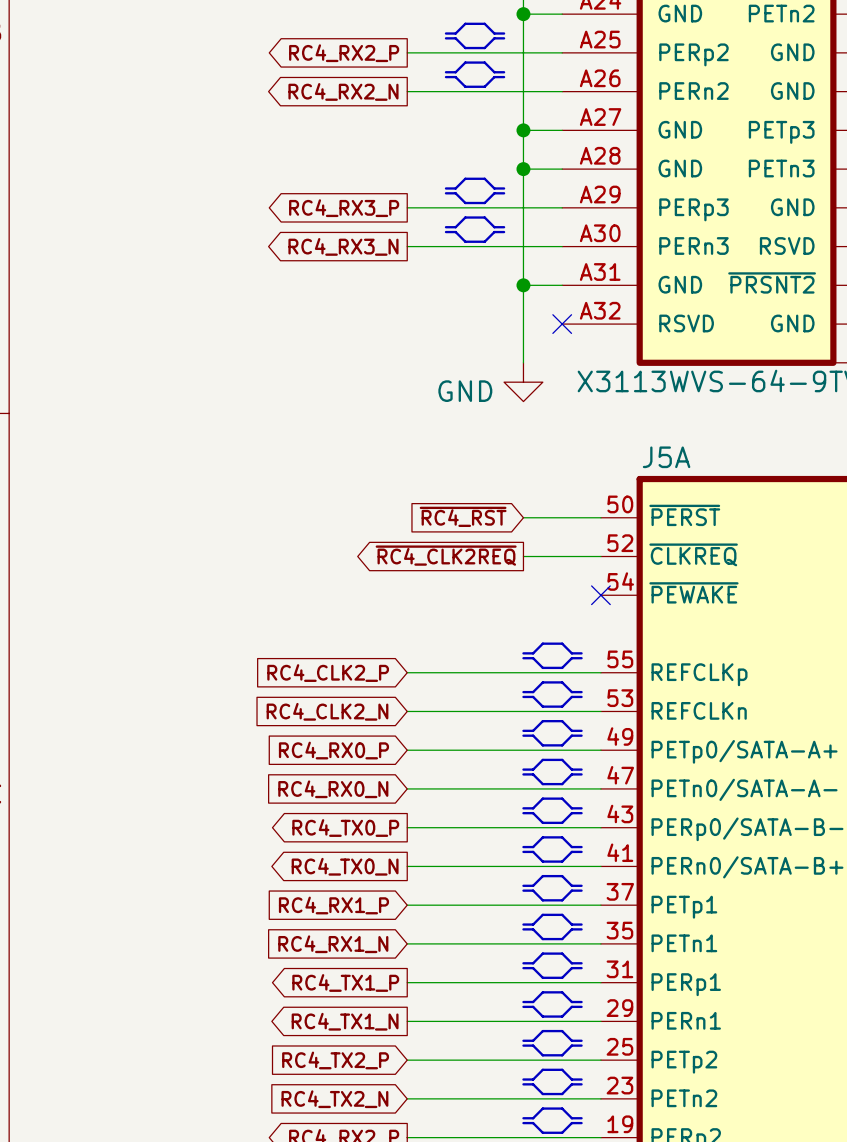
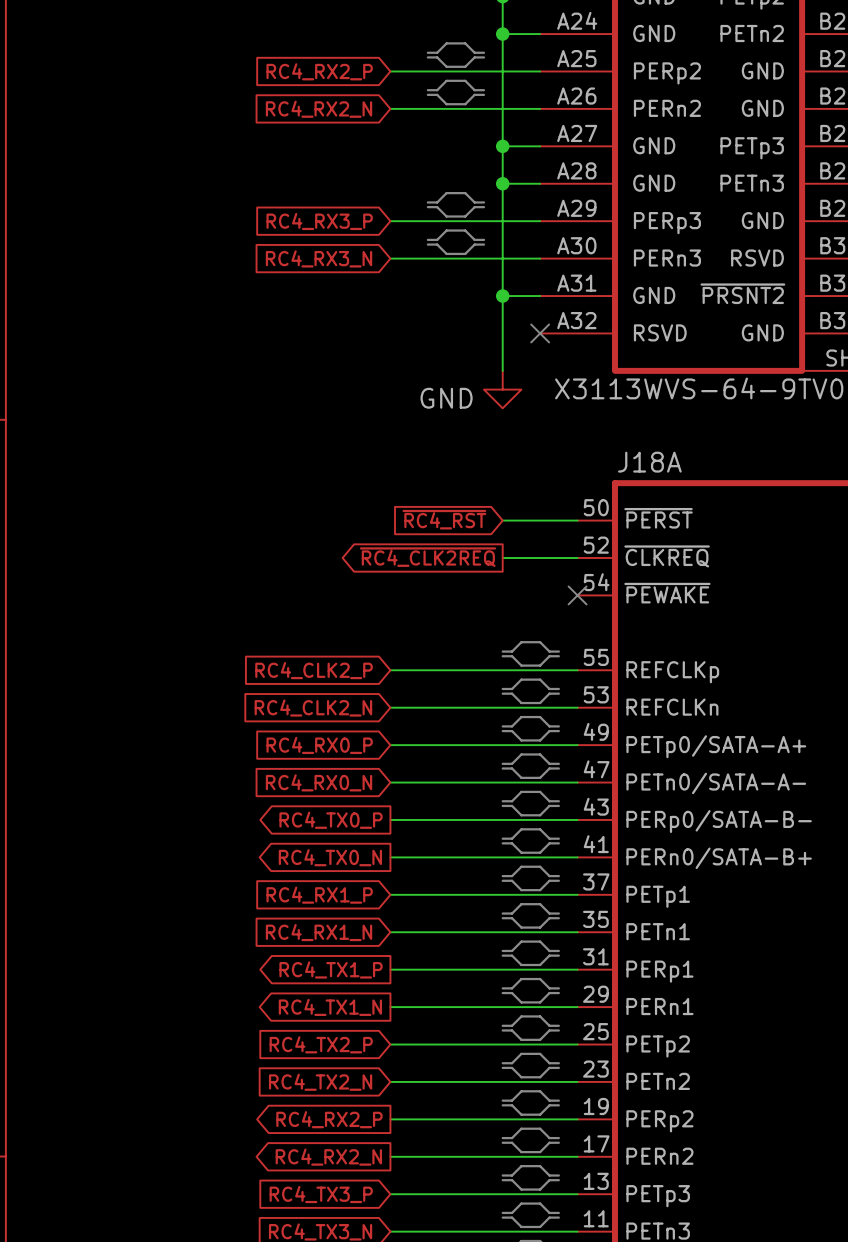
global label shape: output (344, 53) -> input (319, 71)
global label shape: output (343, 91) -> input (319, 109)
global label shape: output (344, 208) -> input (319, 221)
global label shape: output (343, 246) -> input (319, 258)
J5A name: J5A (666, 457) -> J18A (649, 462)

